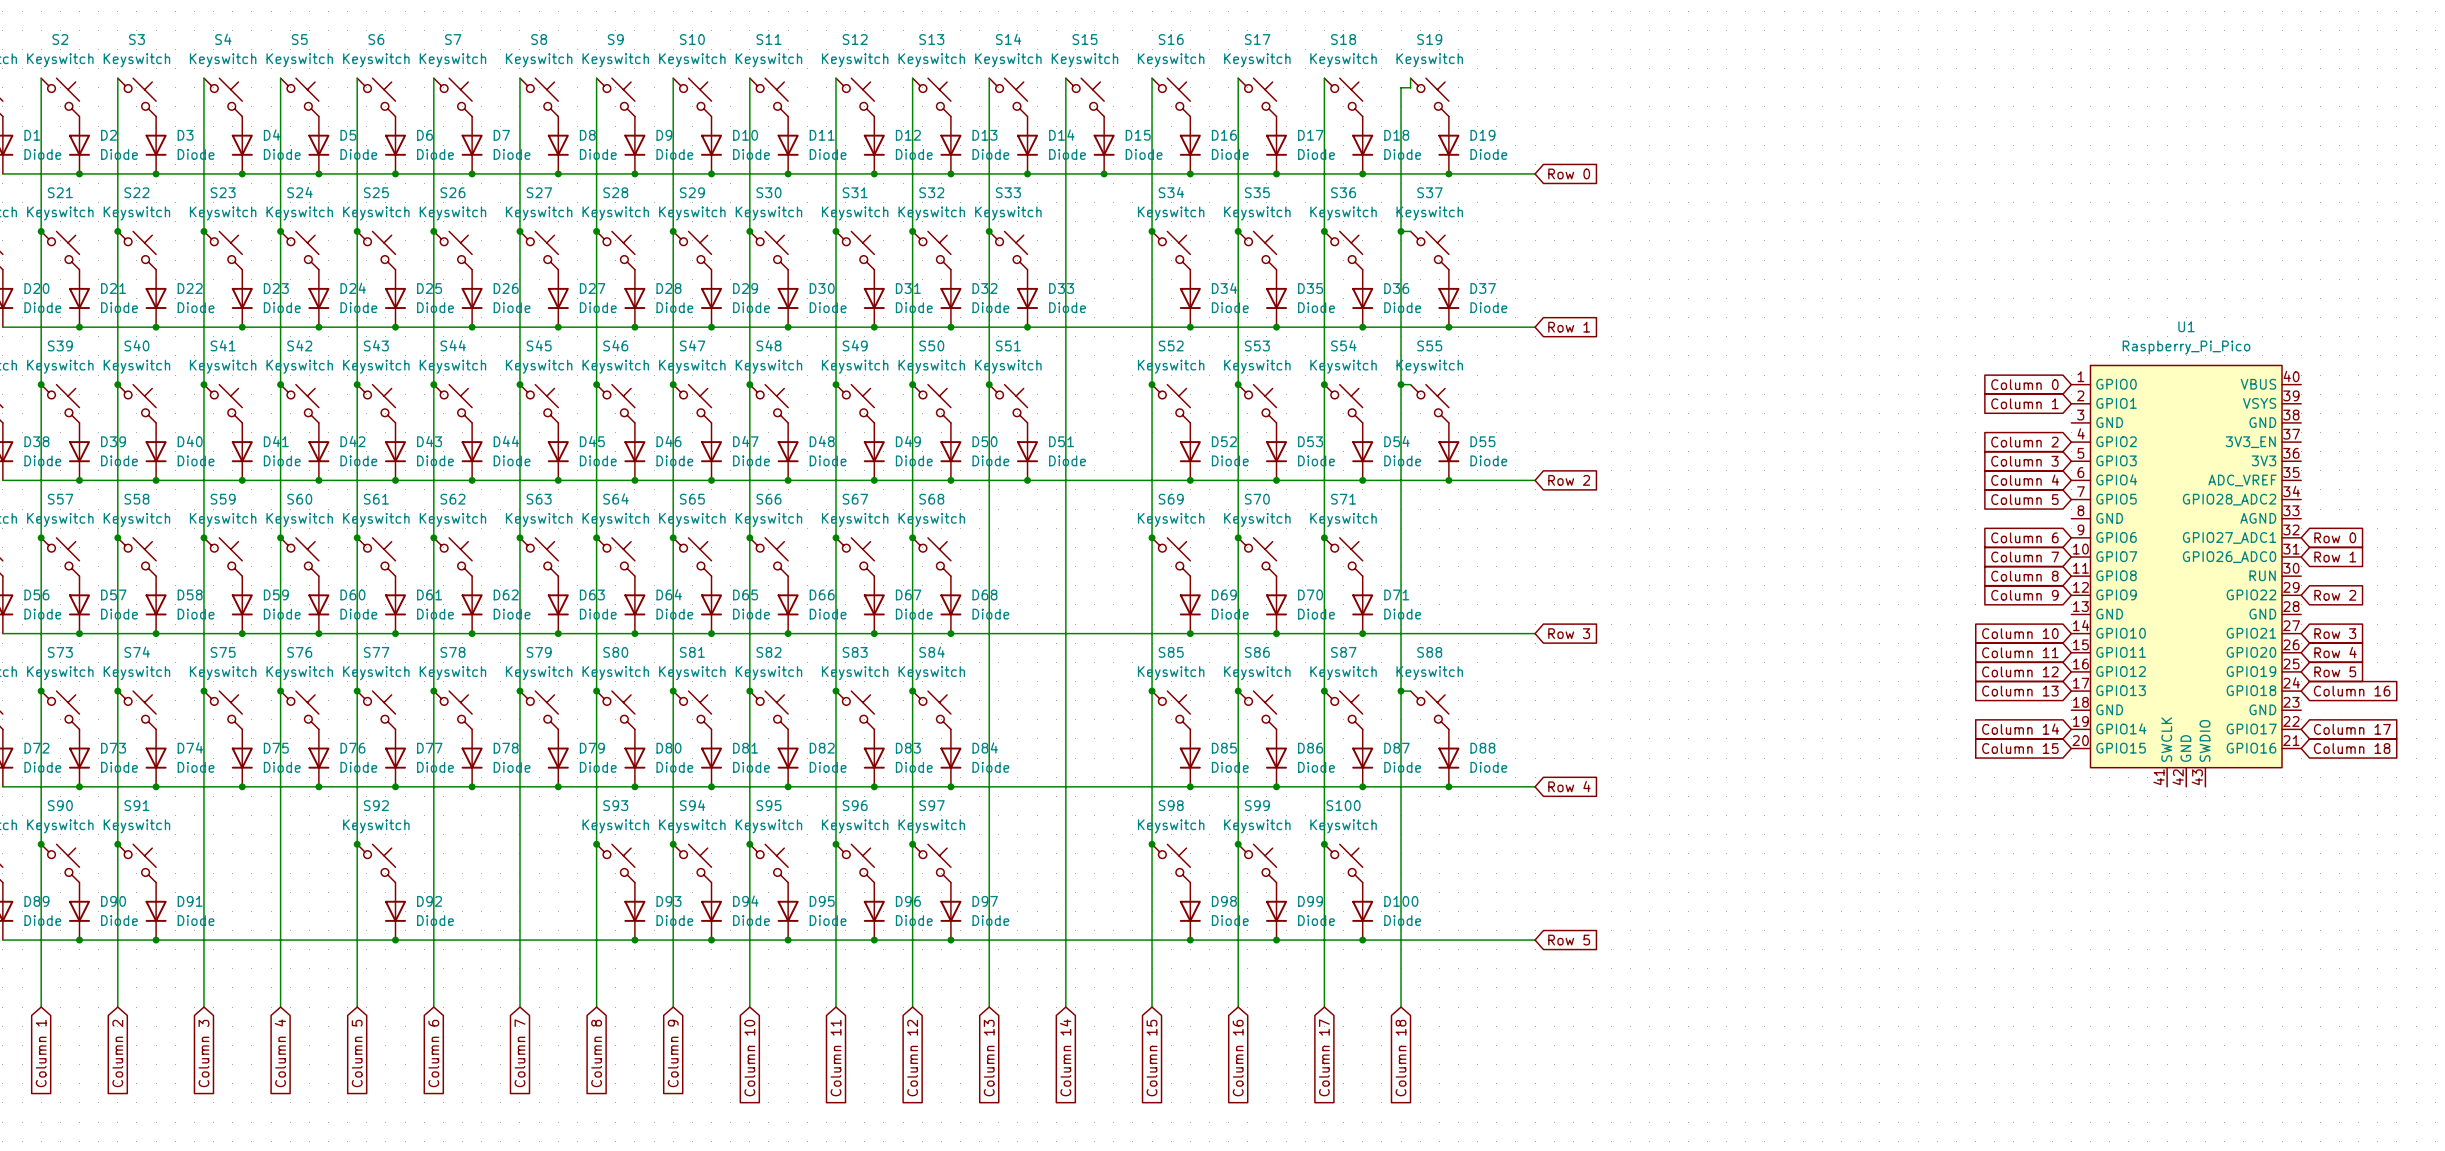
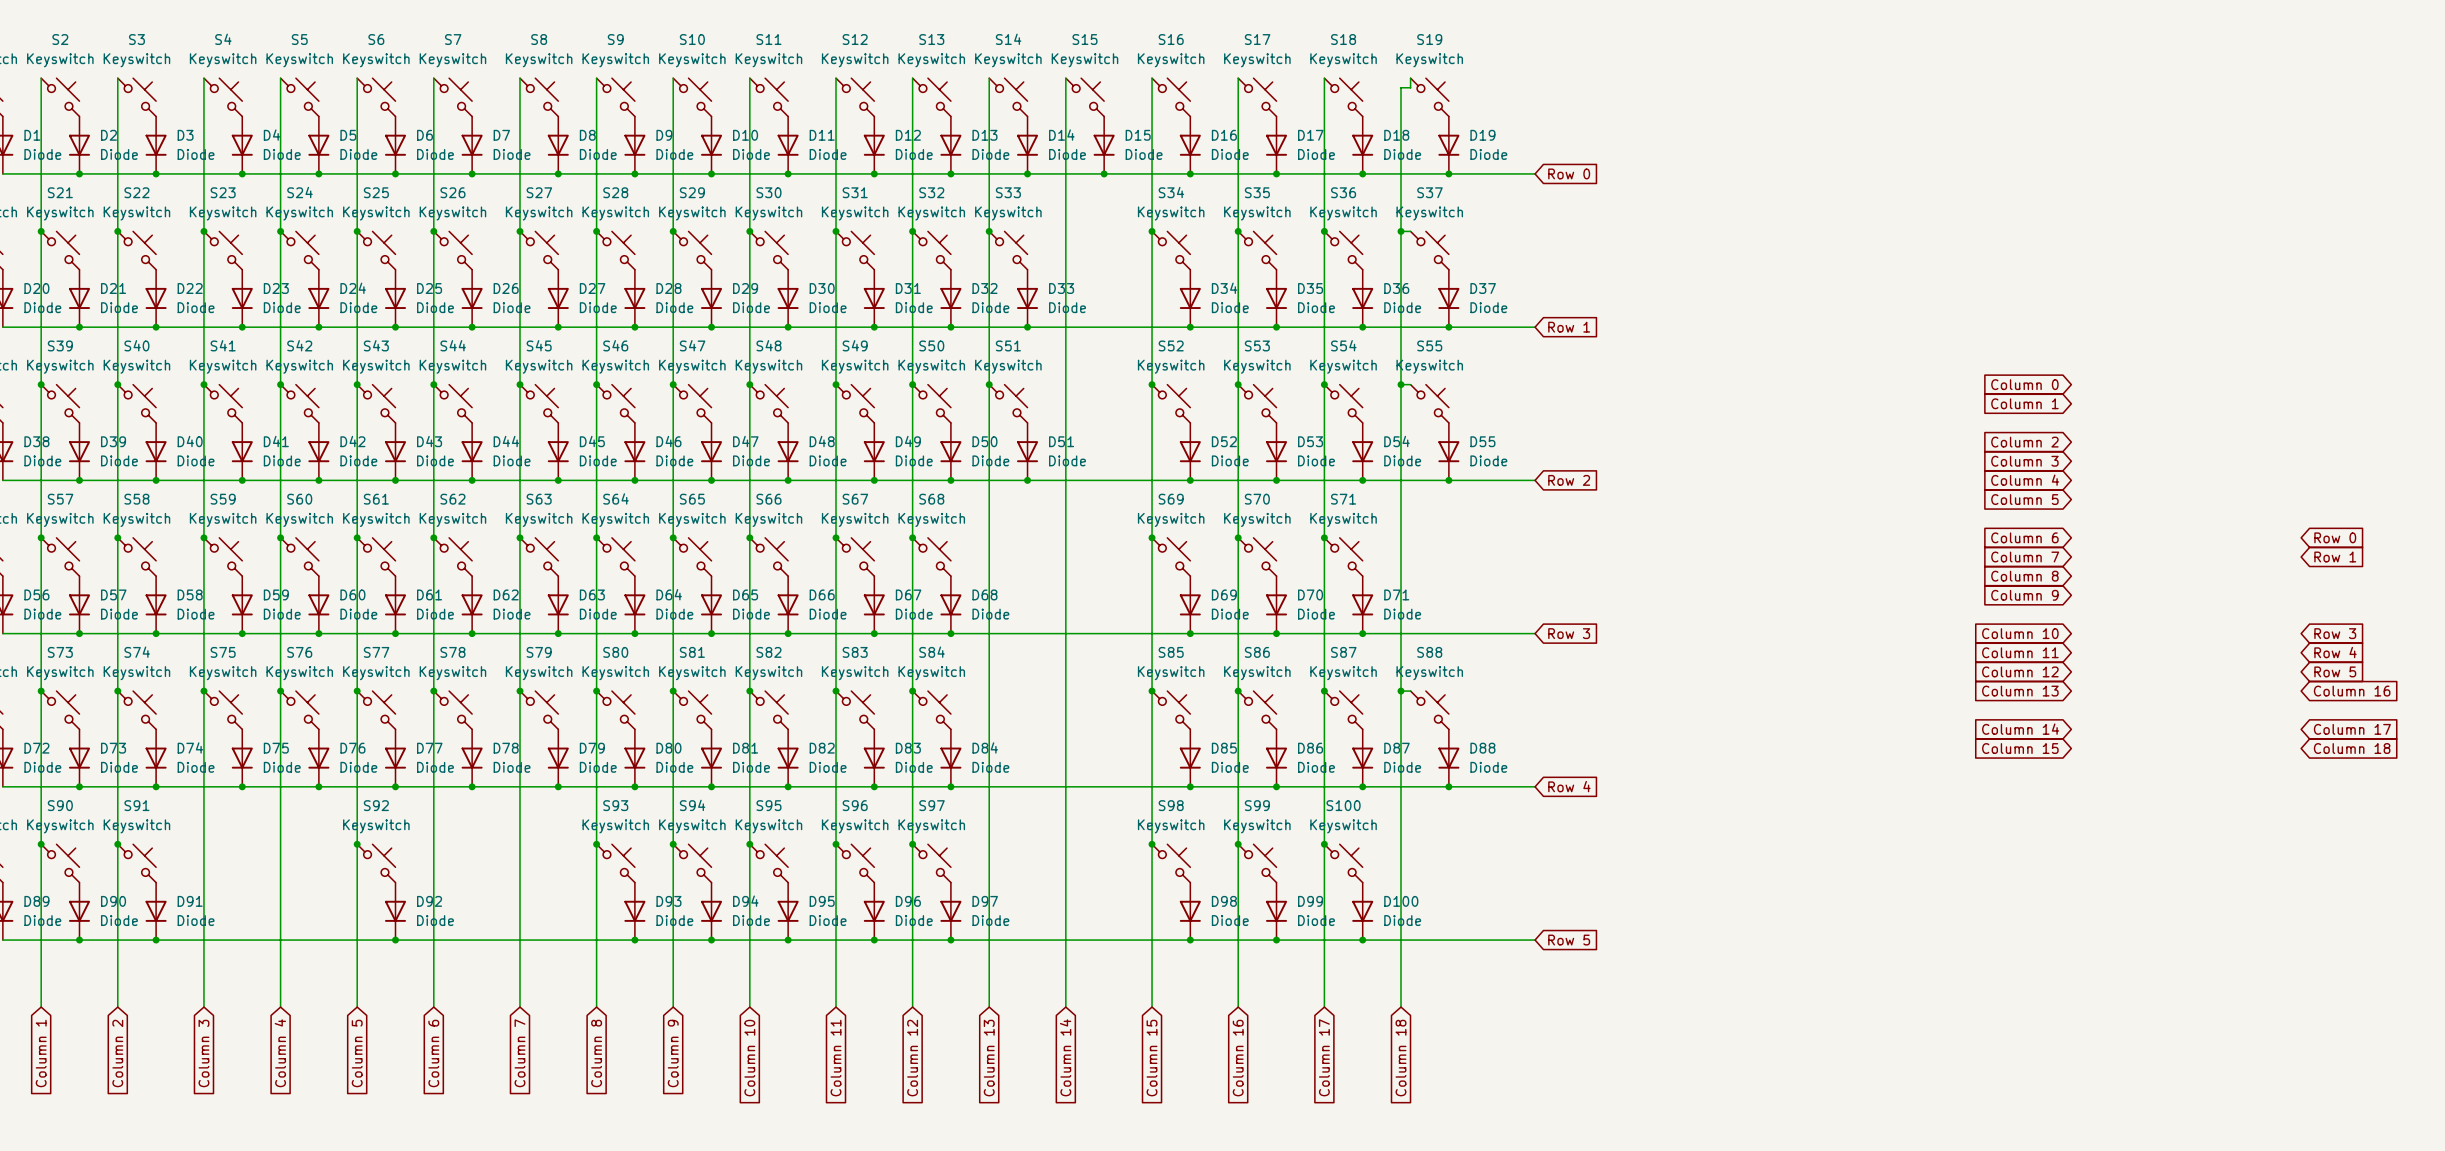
U1: Raspberry_Pi_Pico (2186, 576) -> none
global label: Row 2 (2335, 595) -> none

